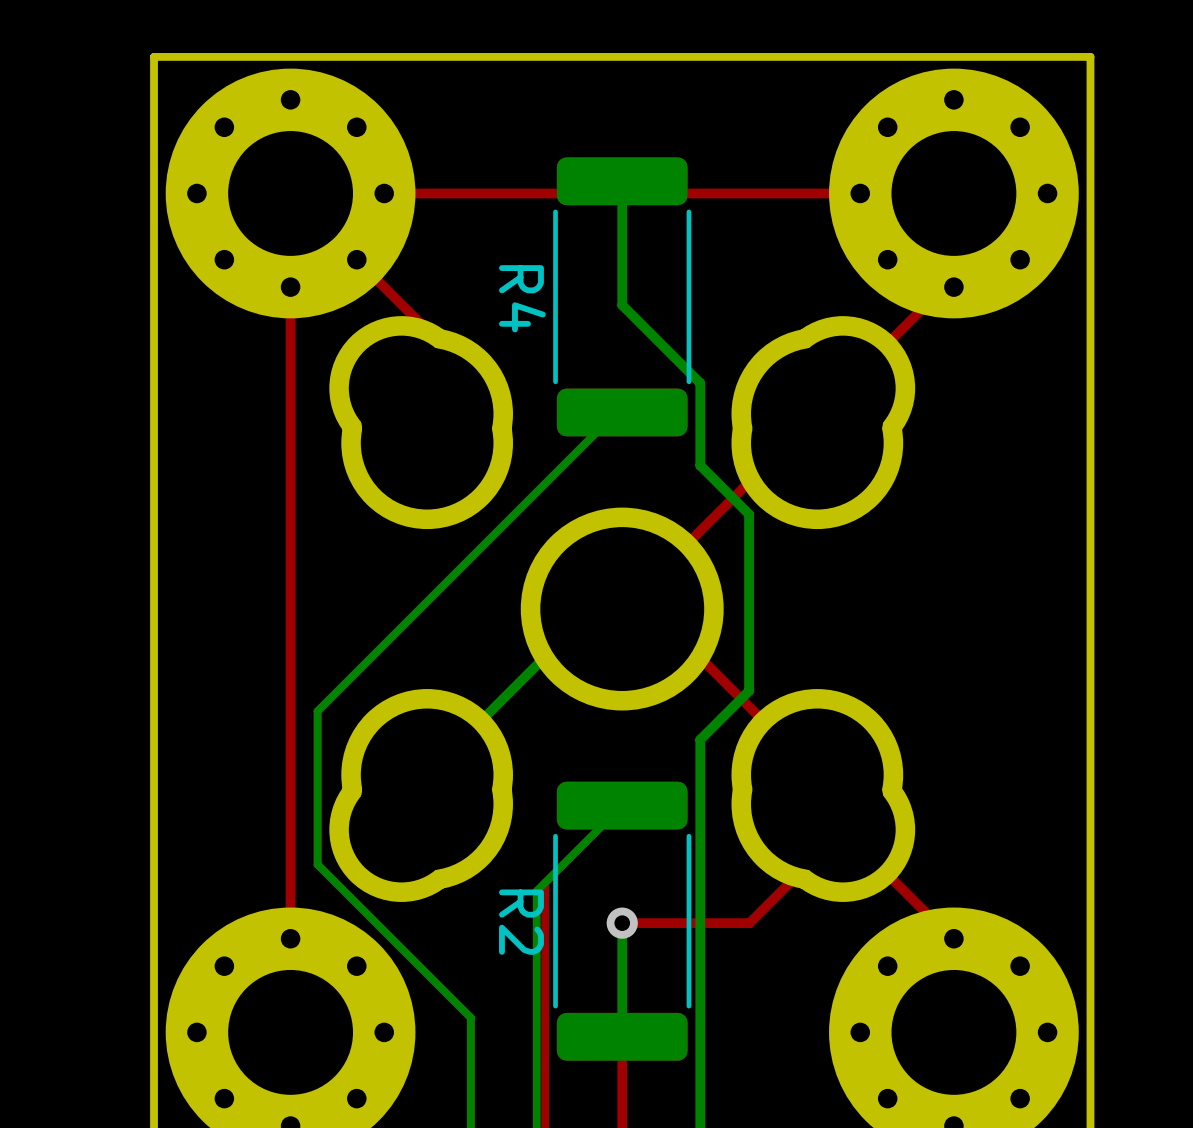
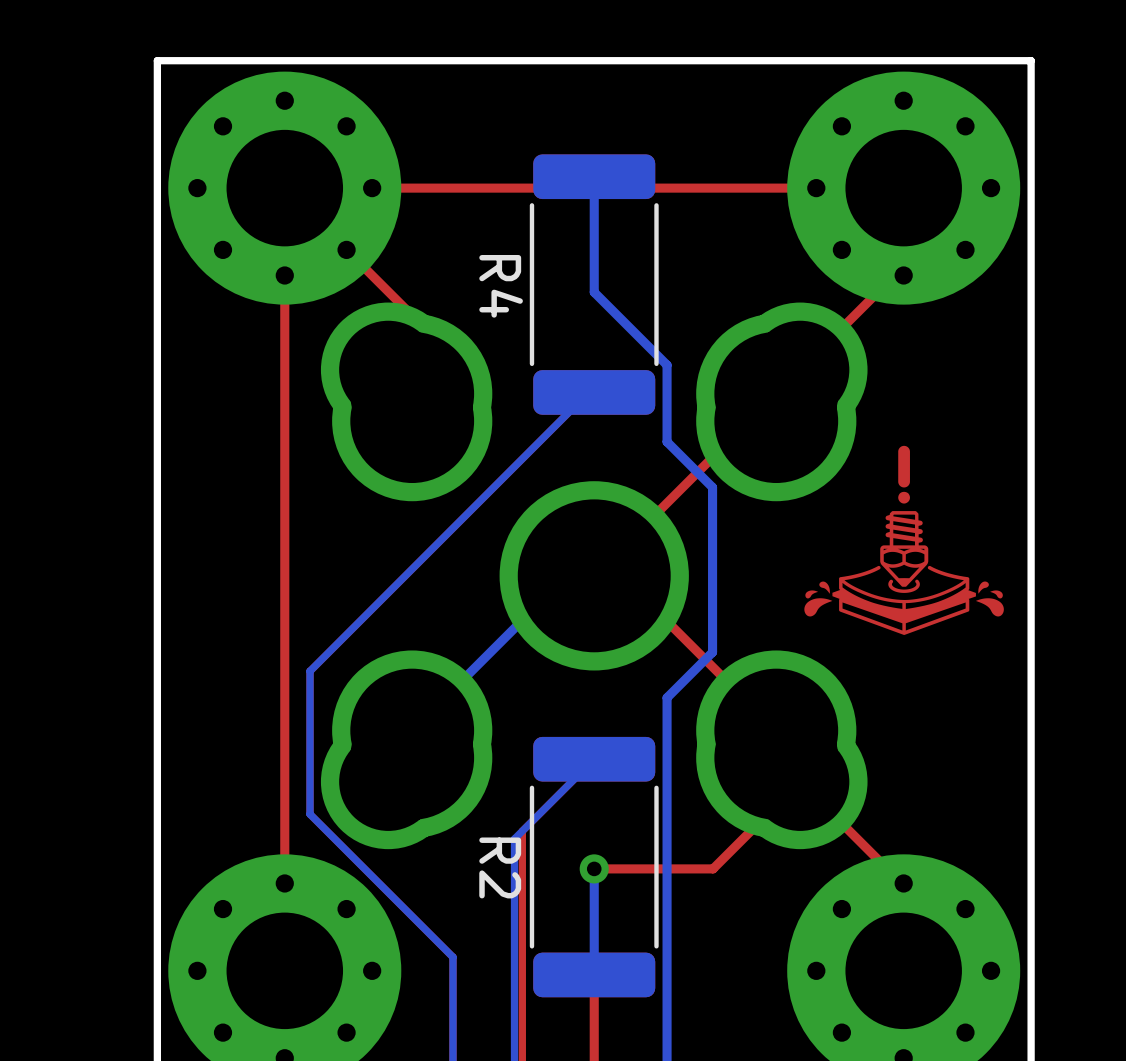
drawing: none -> [804, 445, 1004, 635]

